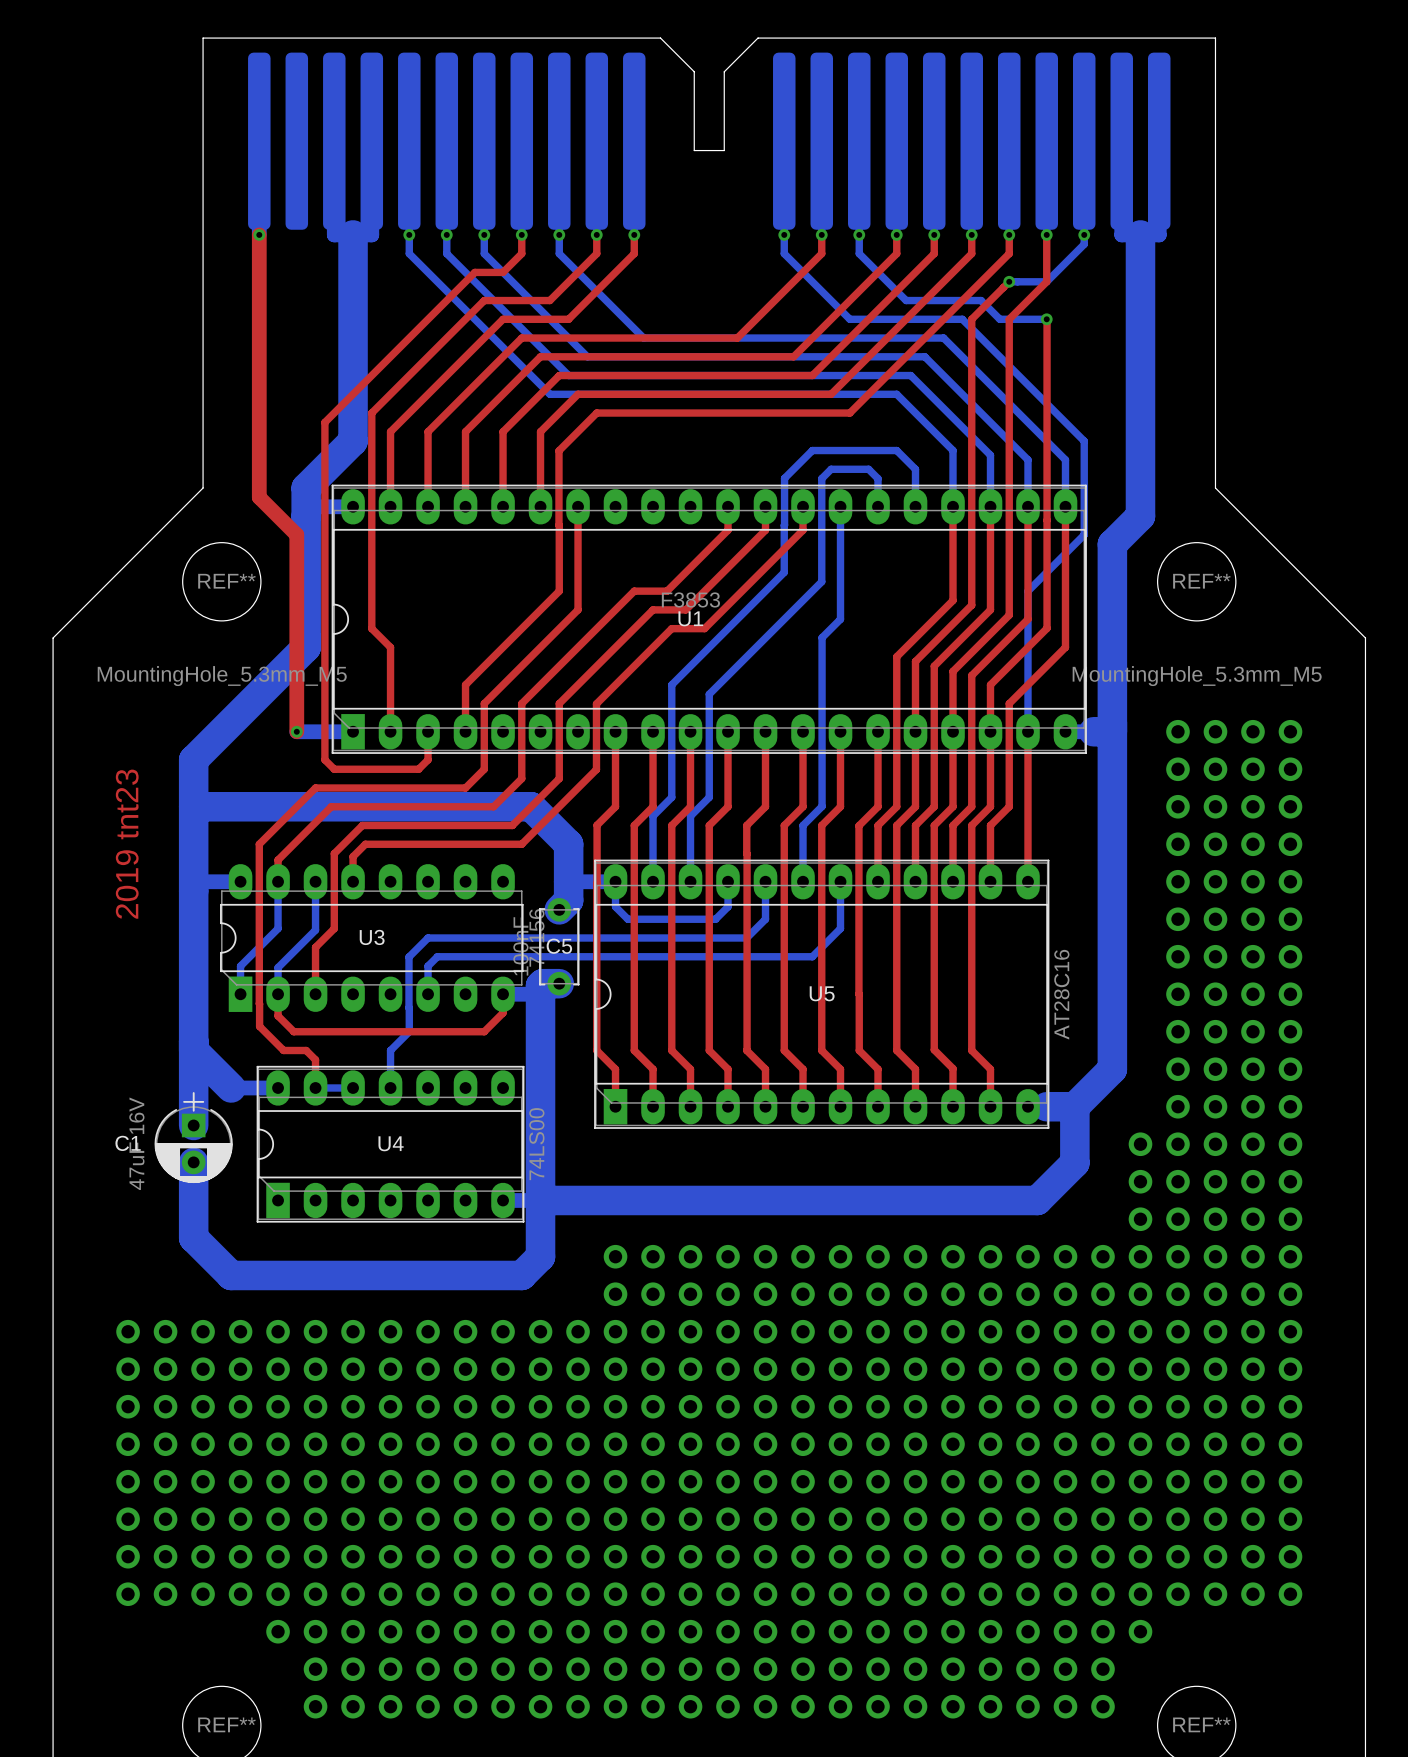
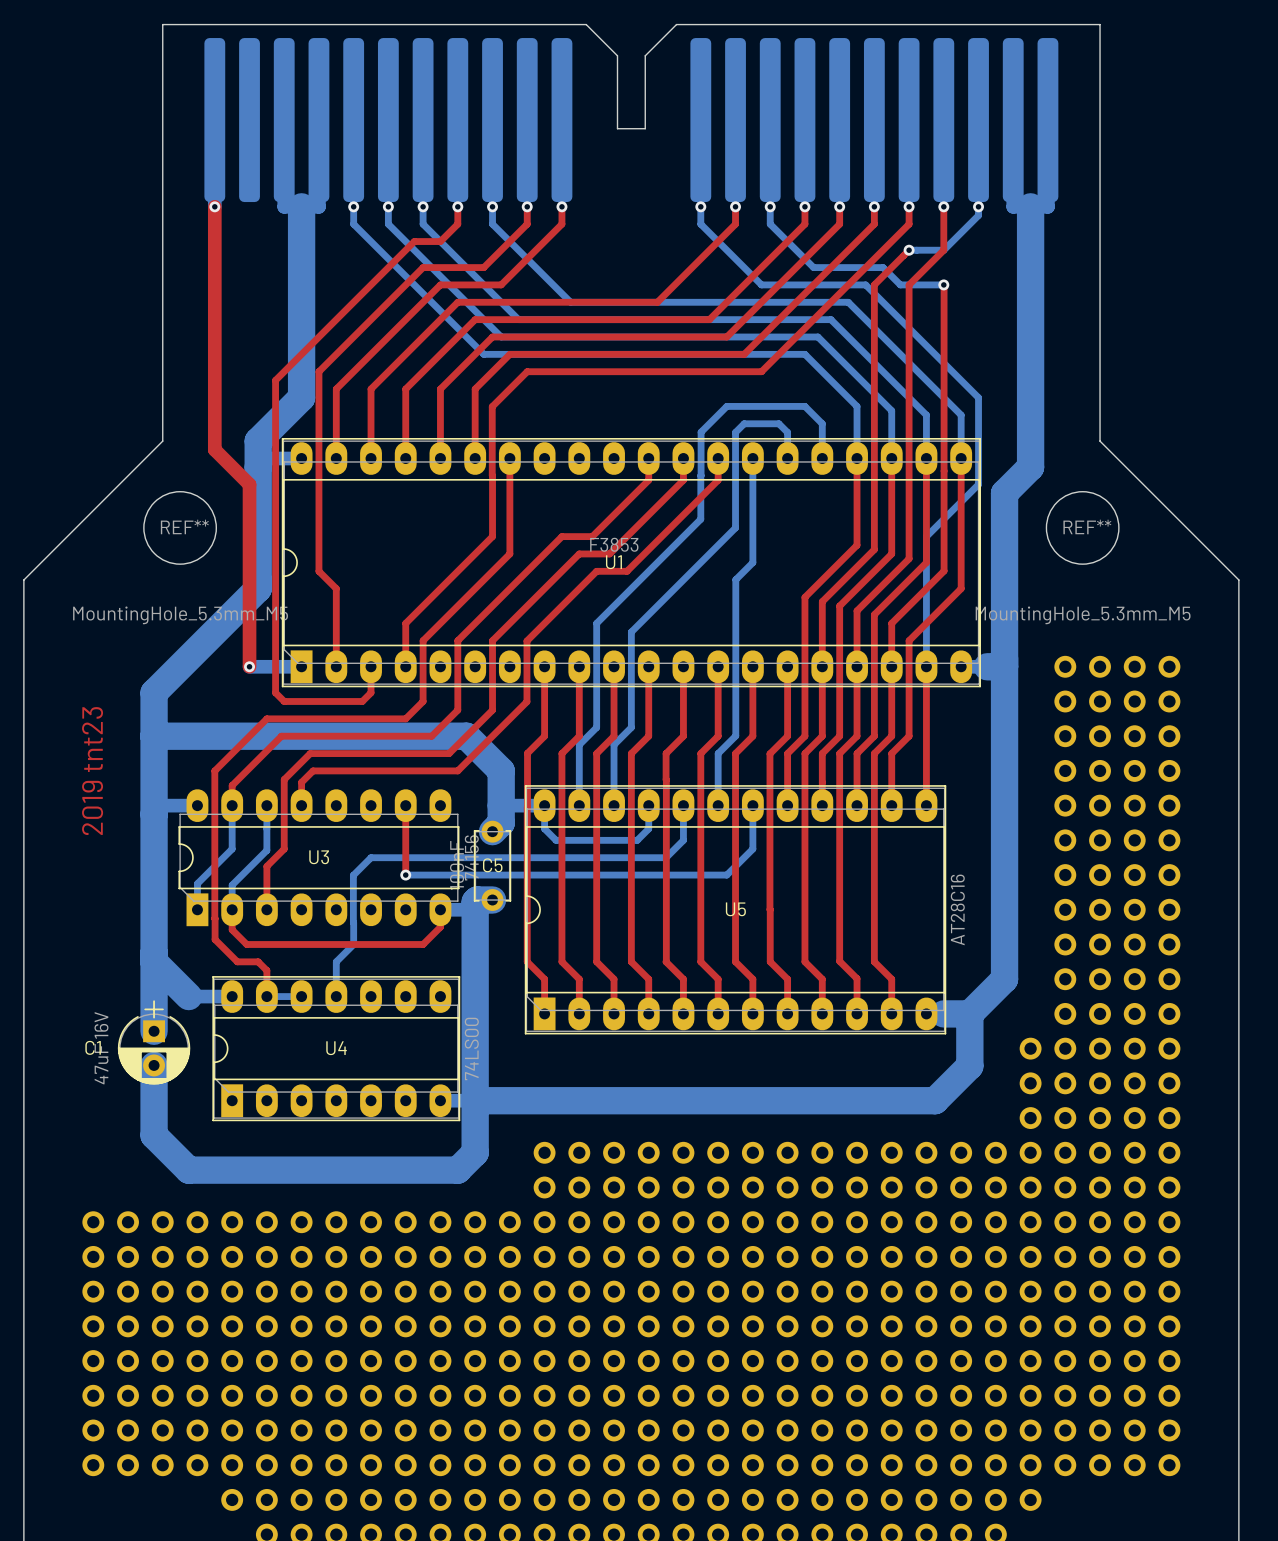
top track: none -> (405, 805) (405, 875)
bottom track: (465, 956) (437, 956) (428, 966) (428, 994) -> none
via: none -> (405, 875)

